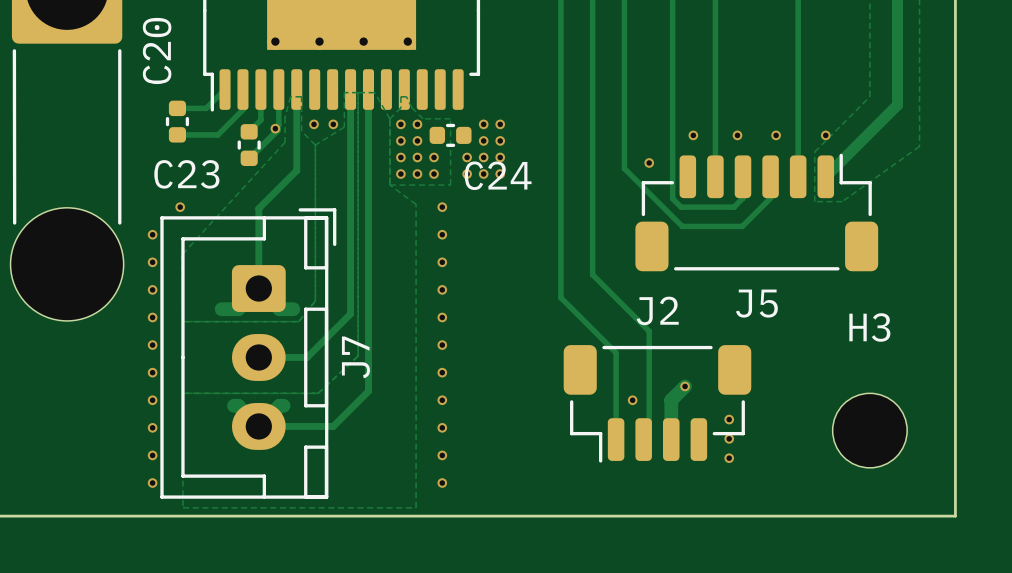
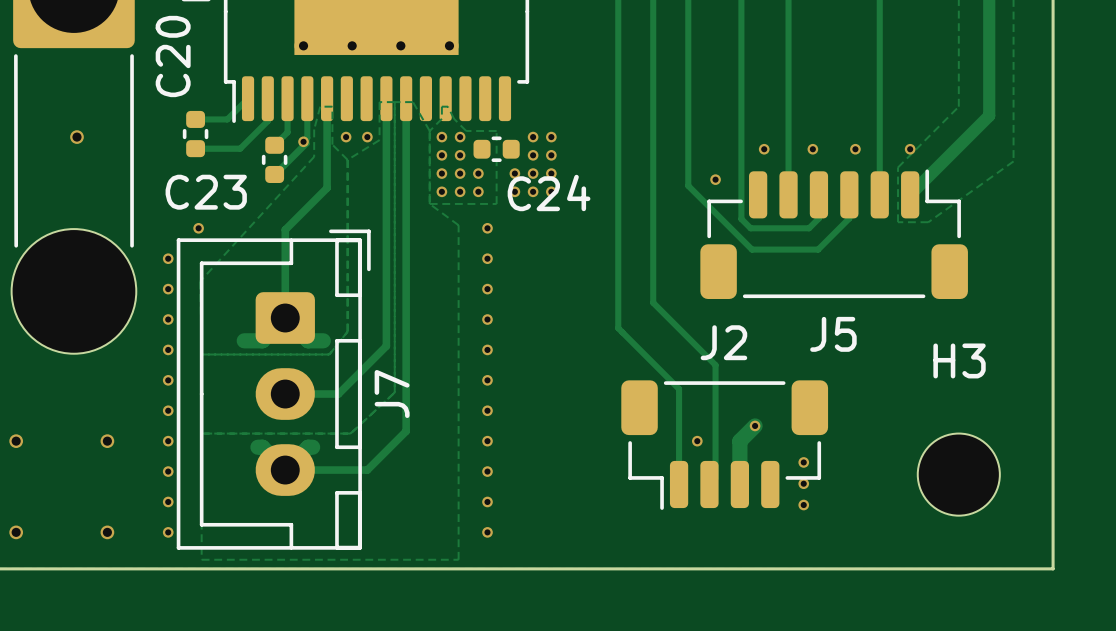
via: none -> (76, 137)
via: none -> (16, 441)
via: none -> (107, 441)
via: none -> (16, 532)
via: none -> (107, 532)

